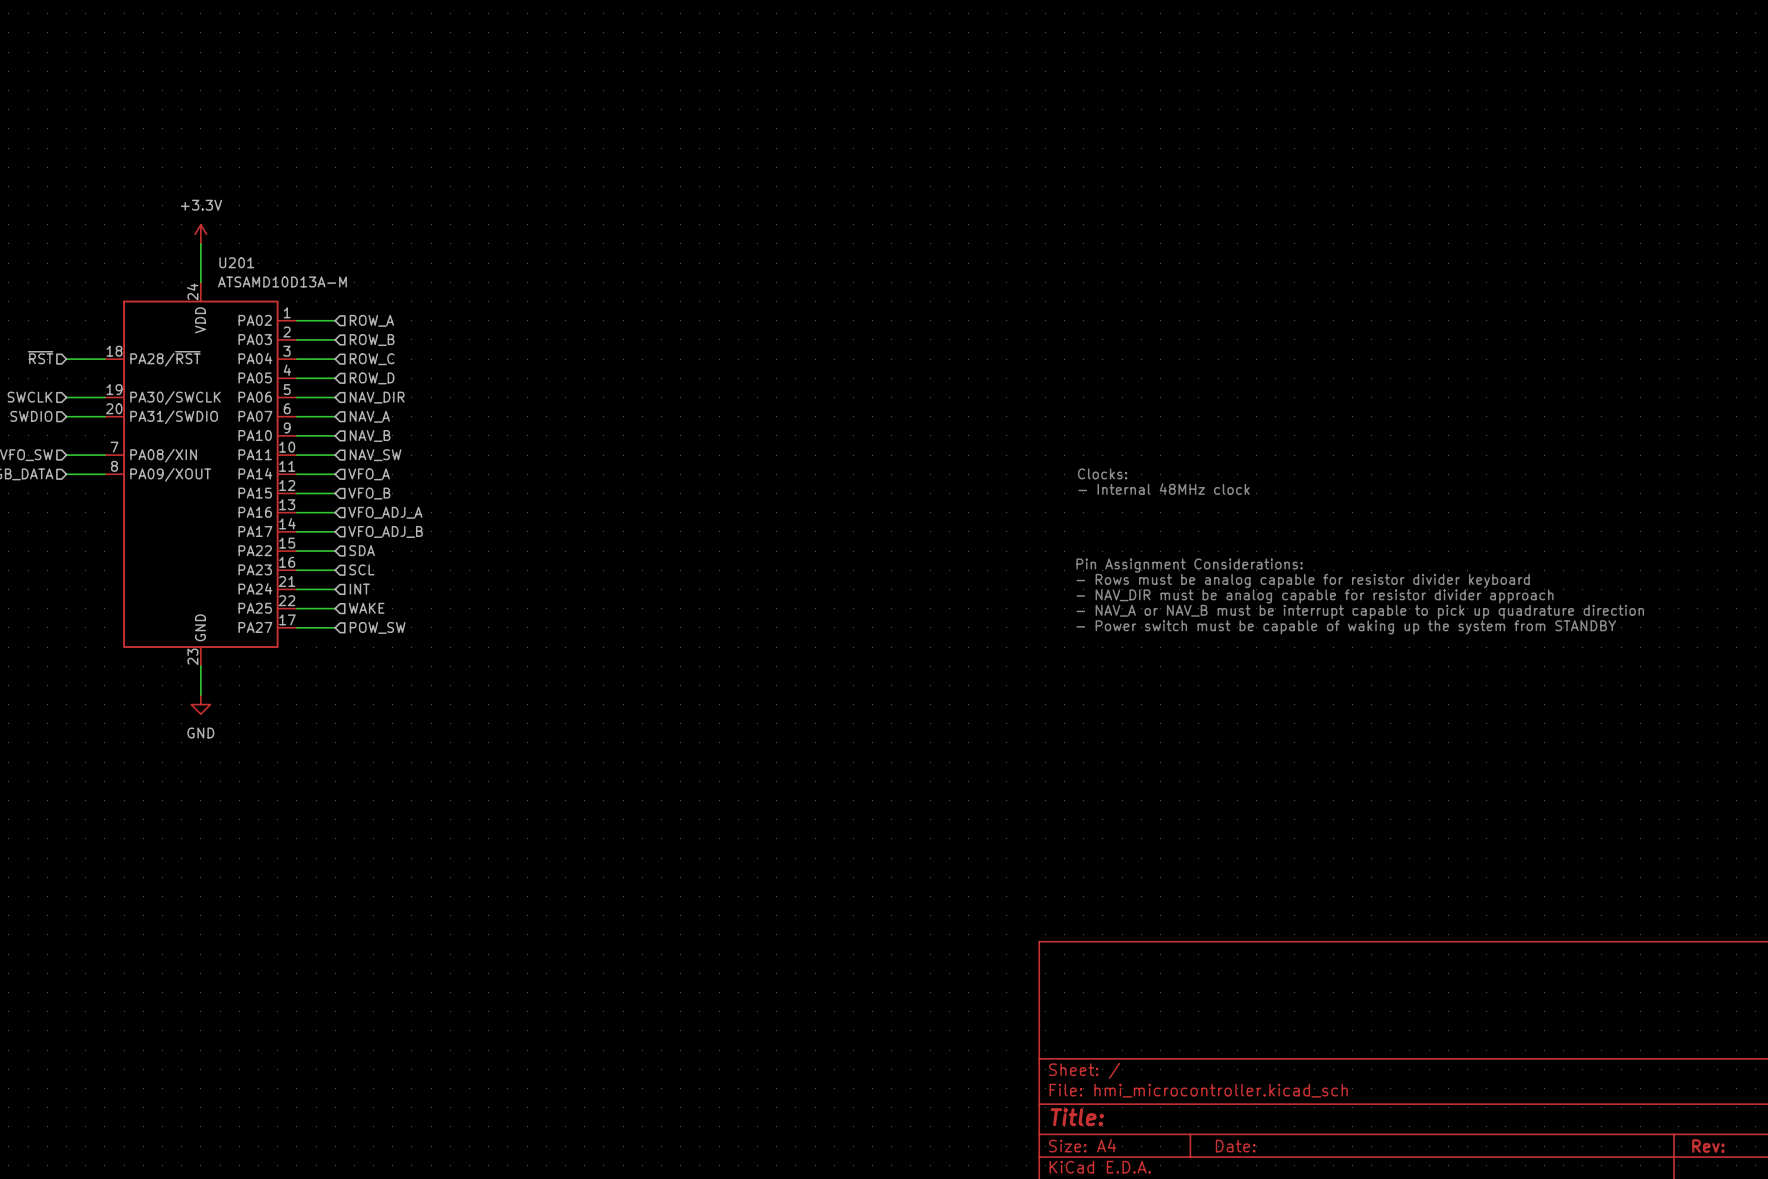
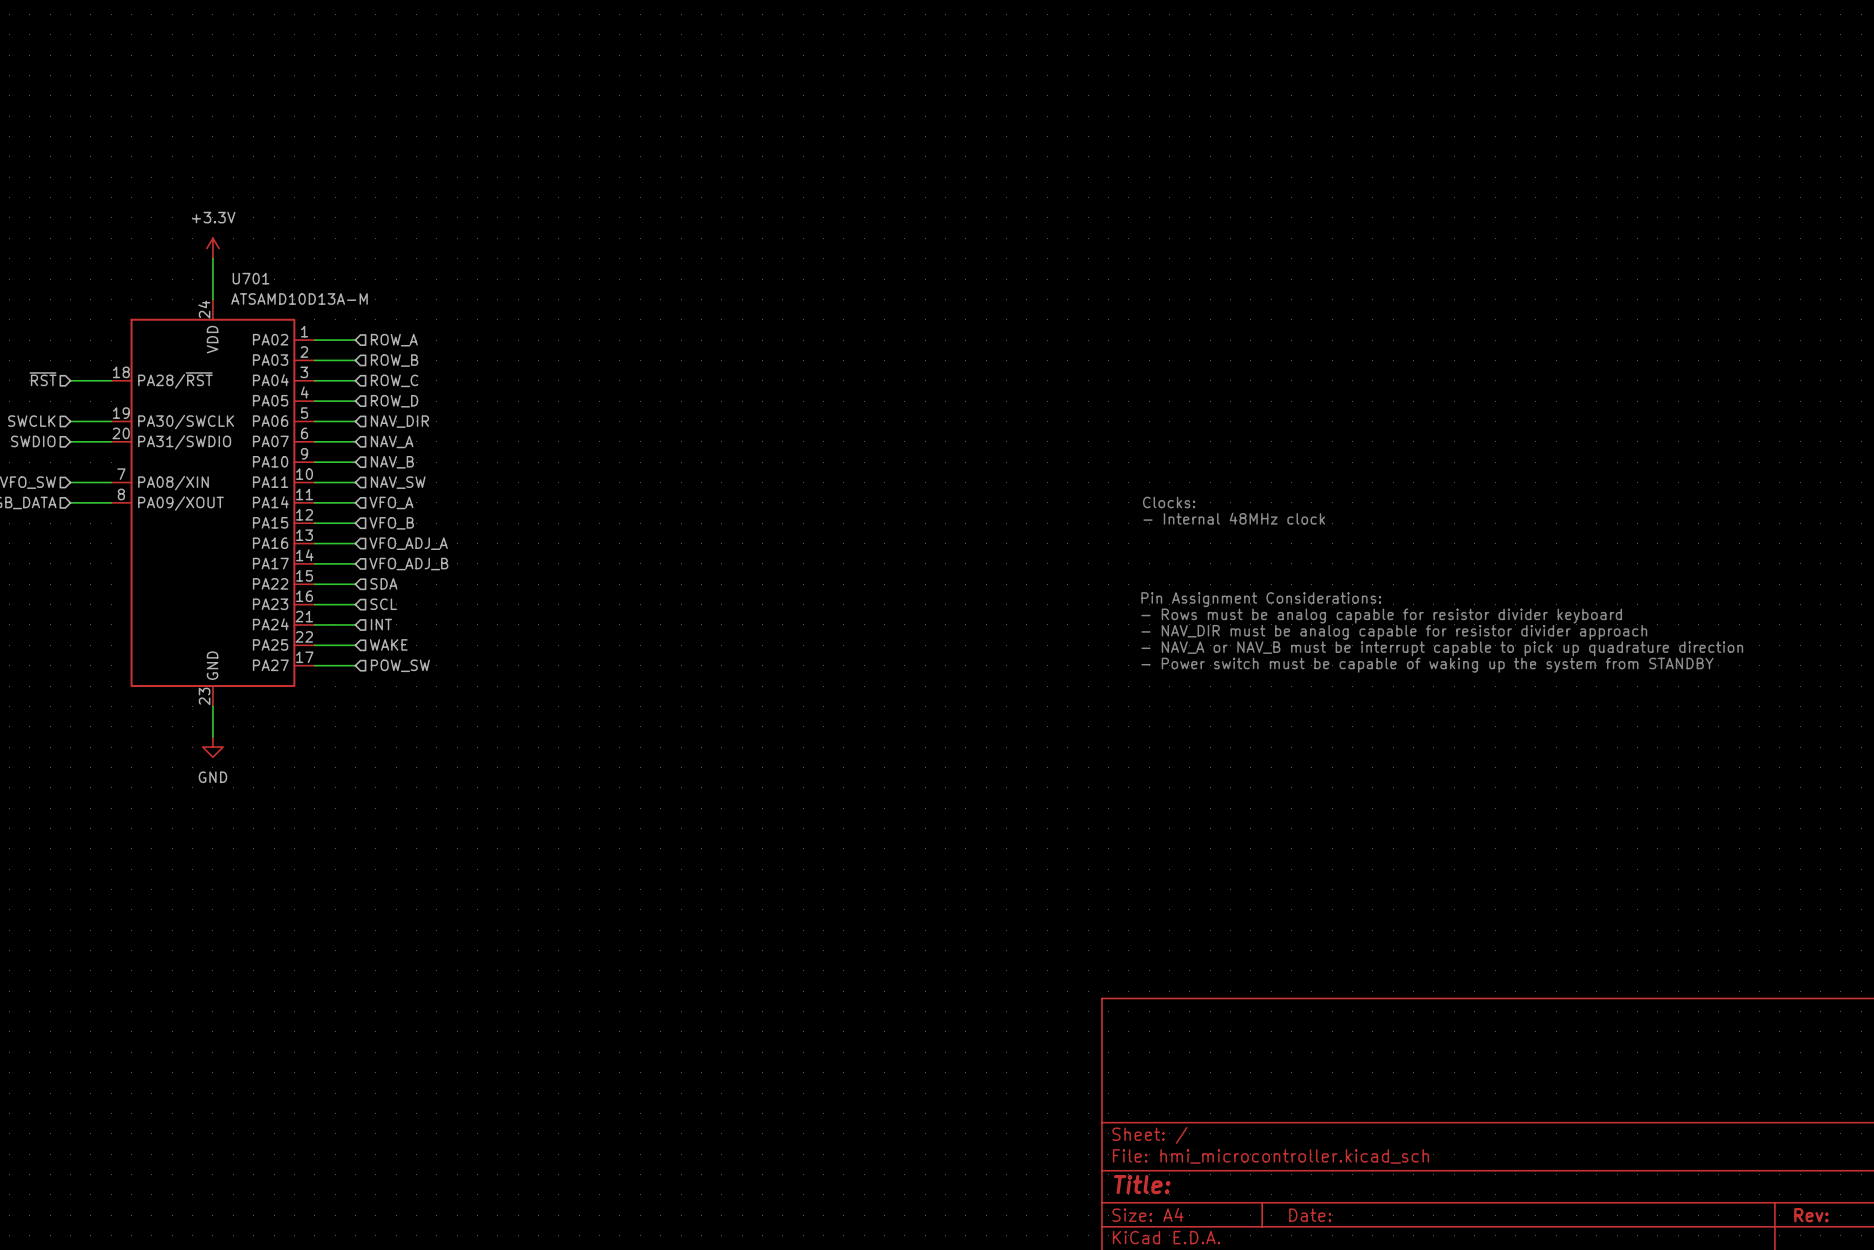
U201 name: U201 (236, 262) -> U701 (251, 278)

